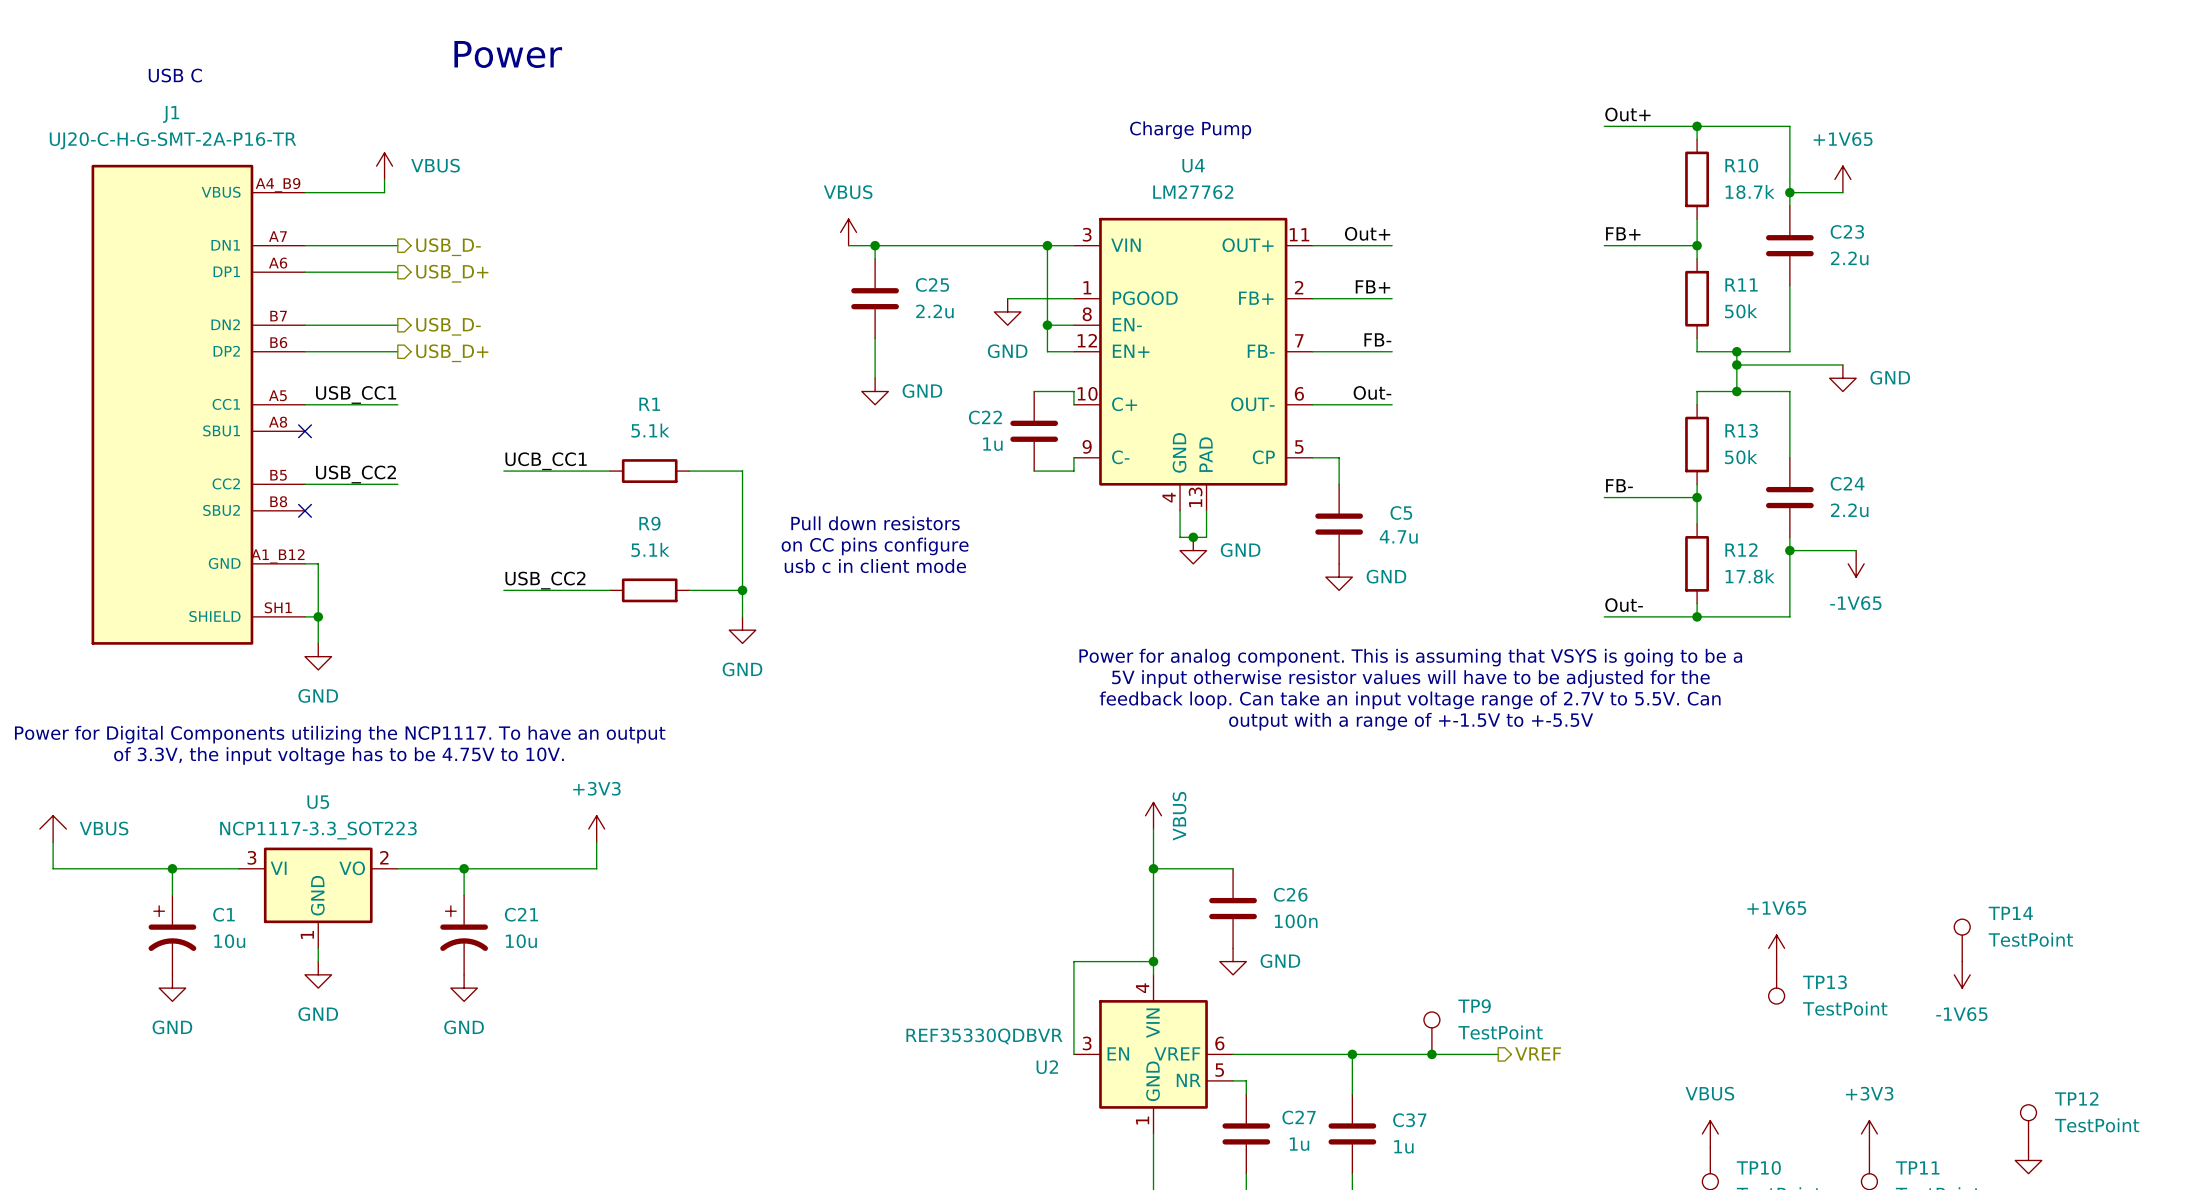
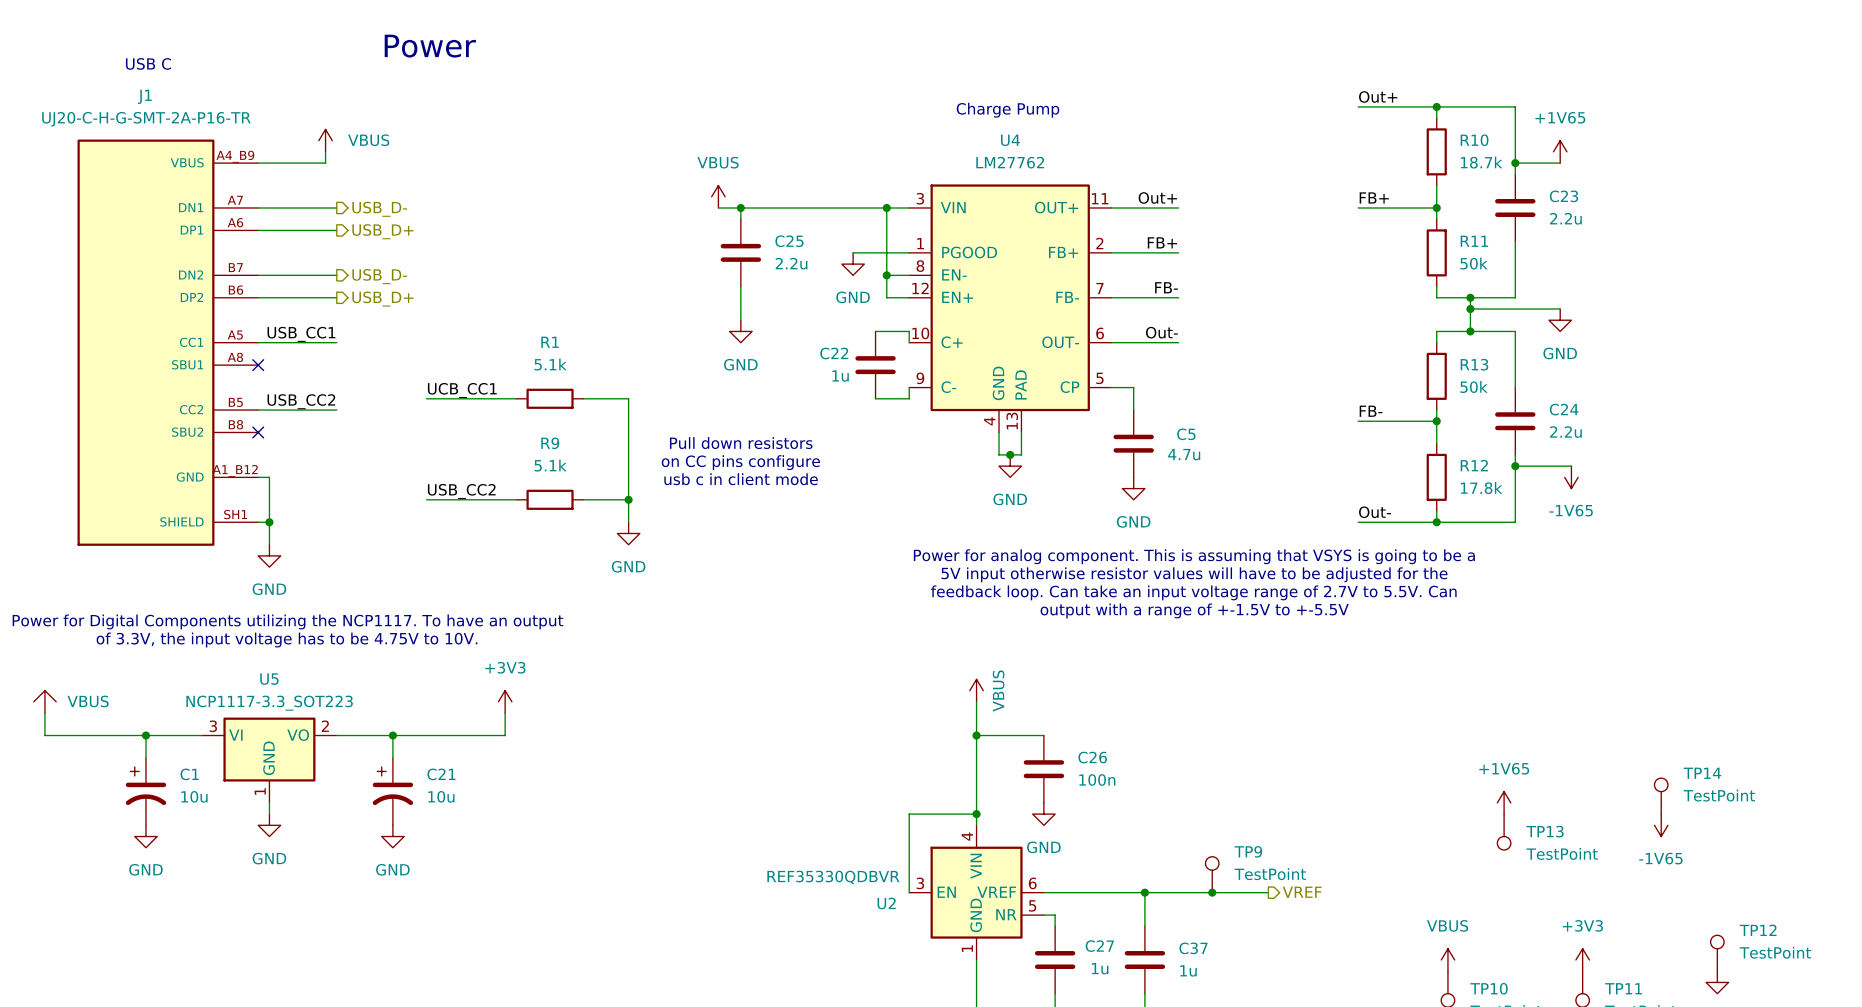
power symbol text position: GND (1890, 377) -> GND (1560, 353)
power symbol text position: GND (922, 391) -> GND (740, 364)
power symbol text position: GND (1240, 550) -> GND (1010, 499)
power symbol text position: GND (1386, 576) -> GND (1133, 521)
power symbol text position: GND (1280, 961) -> GND (1043, 847)

